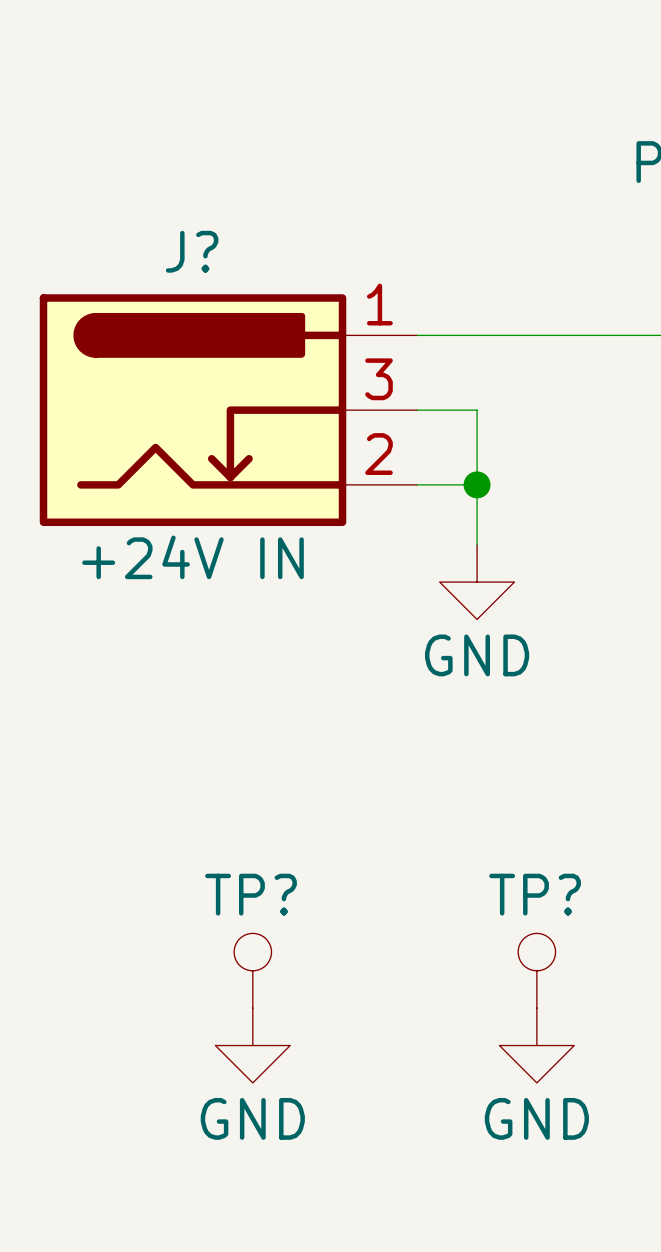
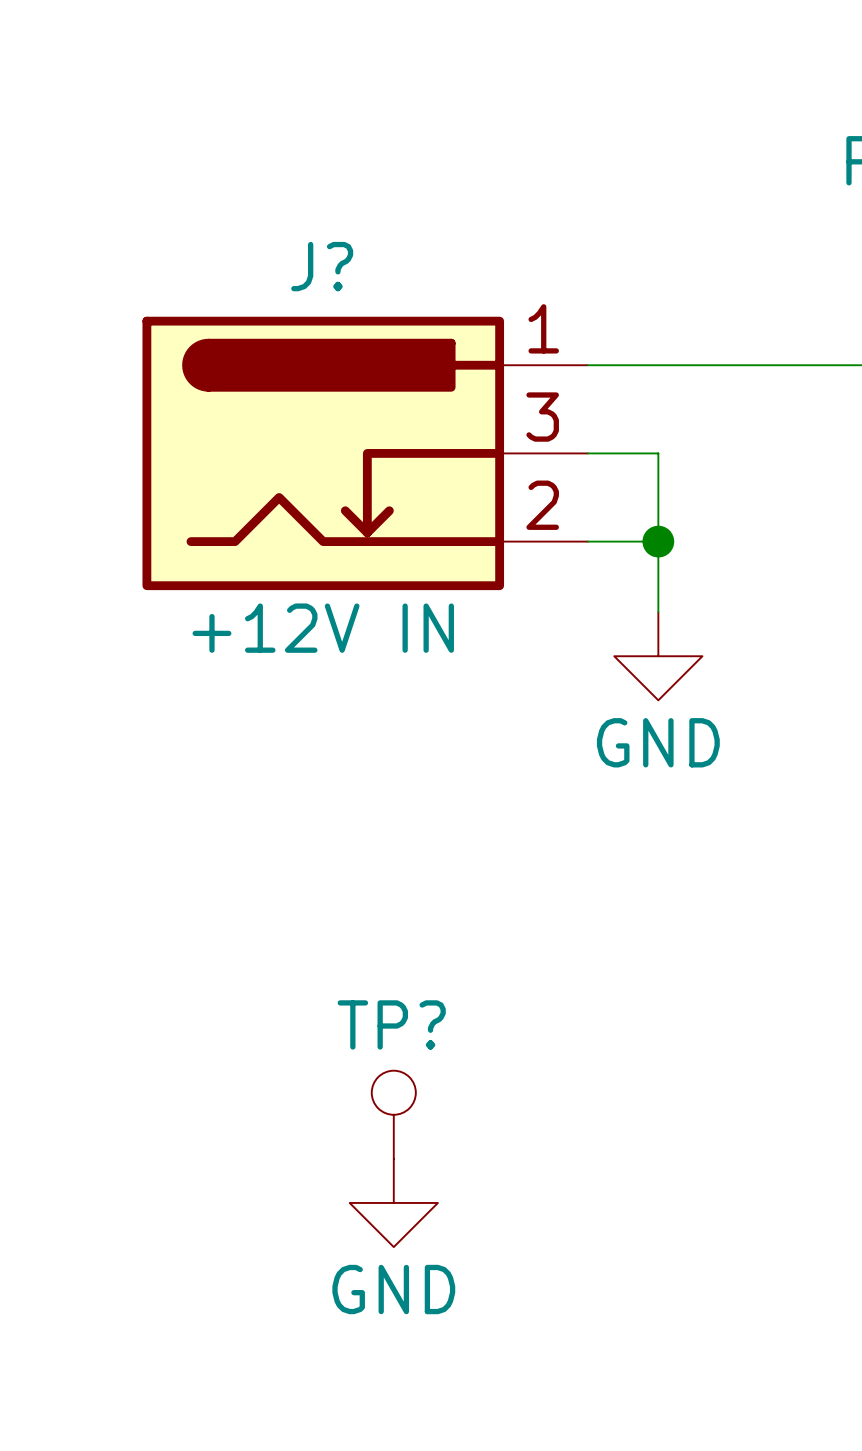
J? value: +24V IN (193, 557) -> +12V IN (323, 628)
TP?: (536, 970) -> none
power symbol: GND (536, 1045) -> none

